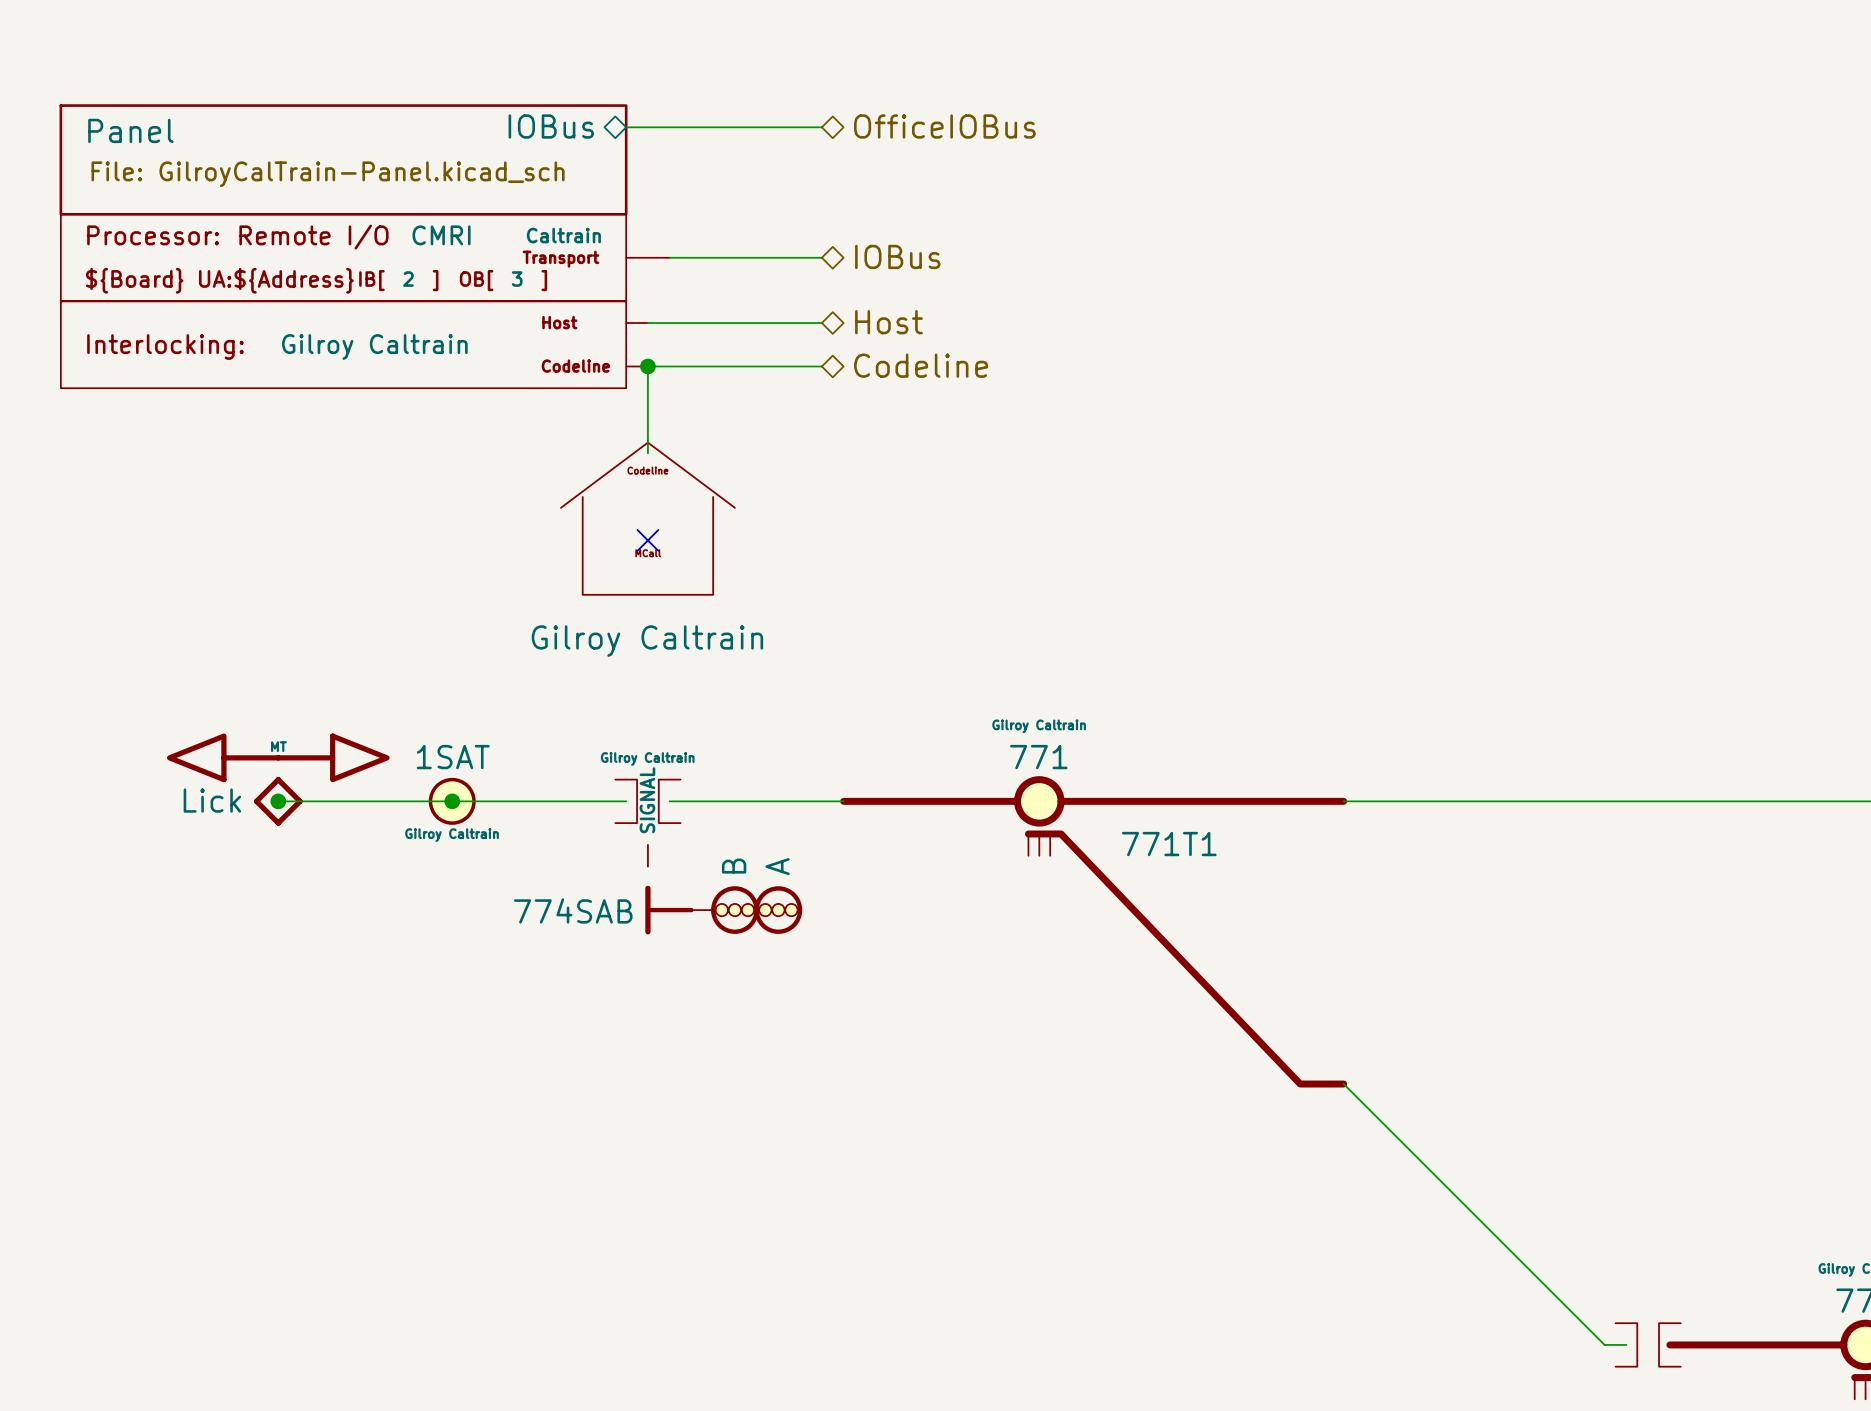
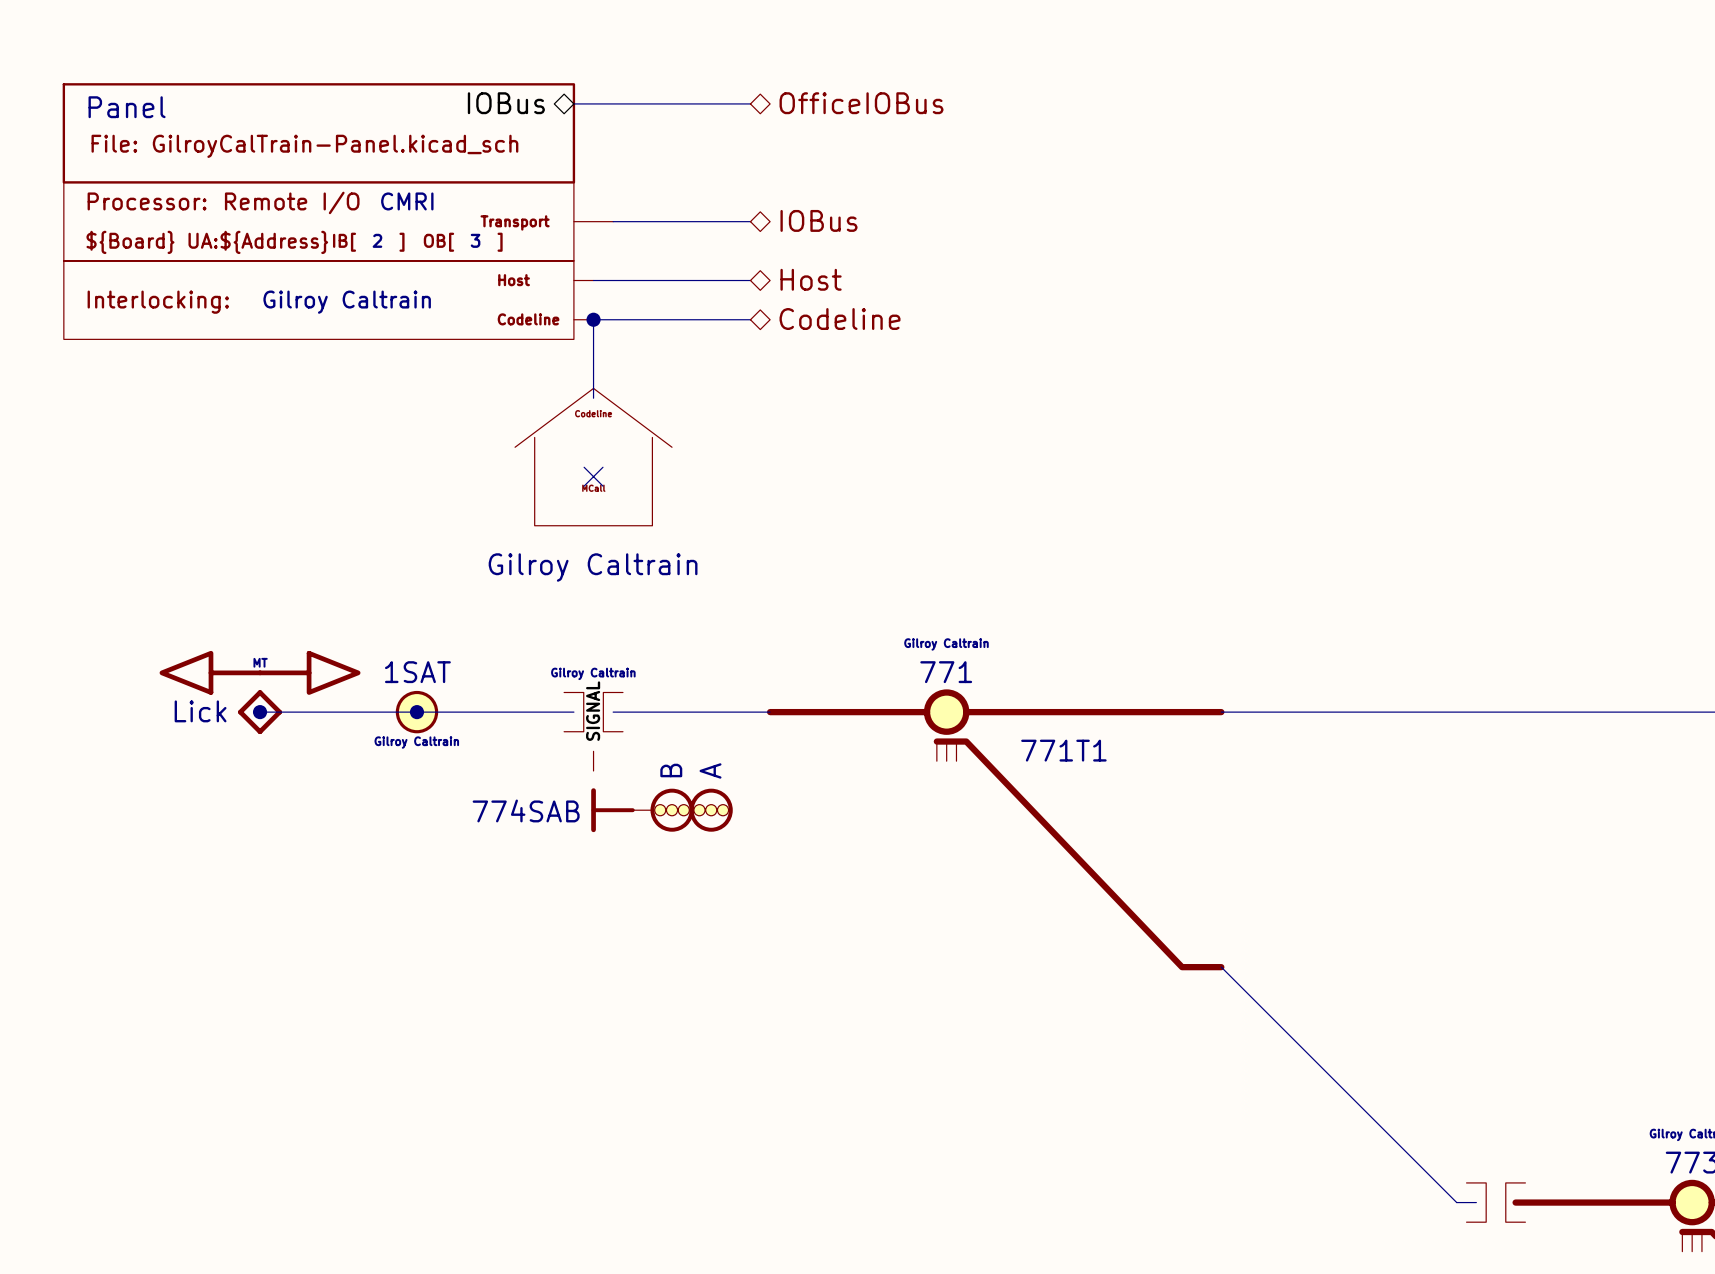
part text: Caltrain (563, 235) -> none

